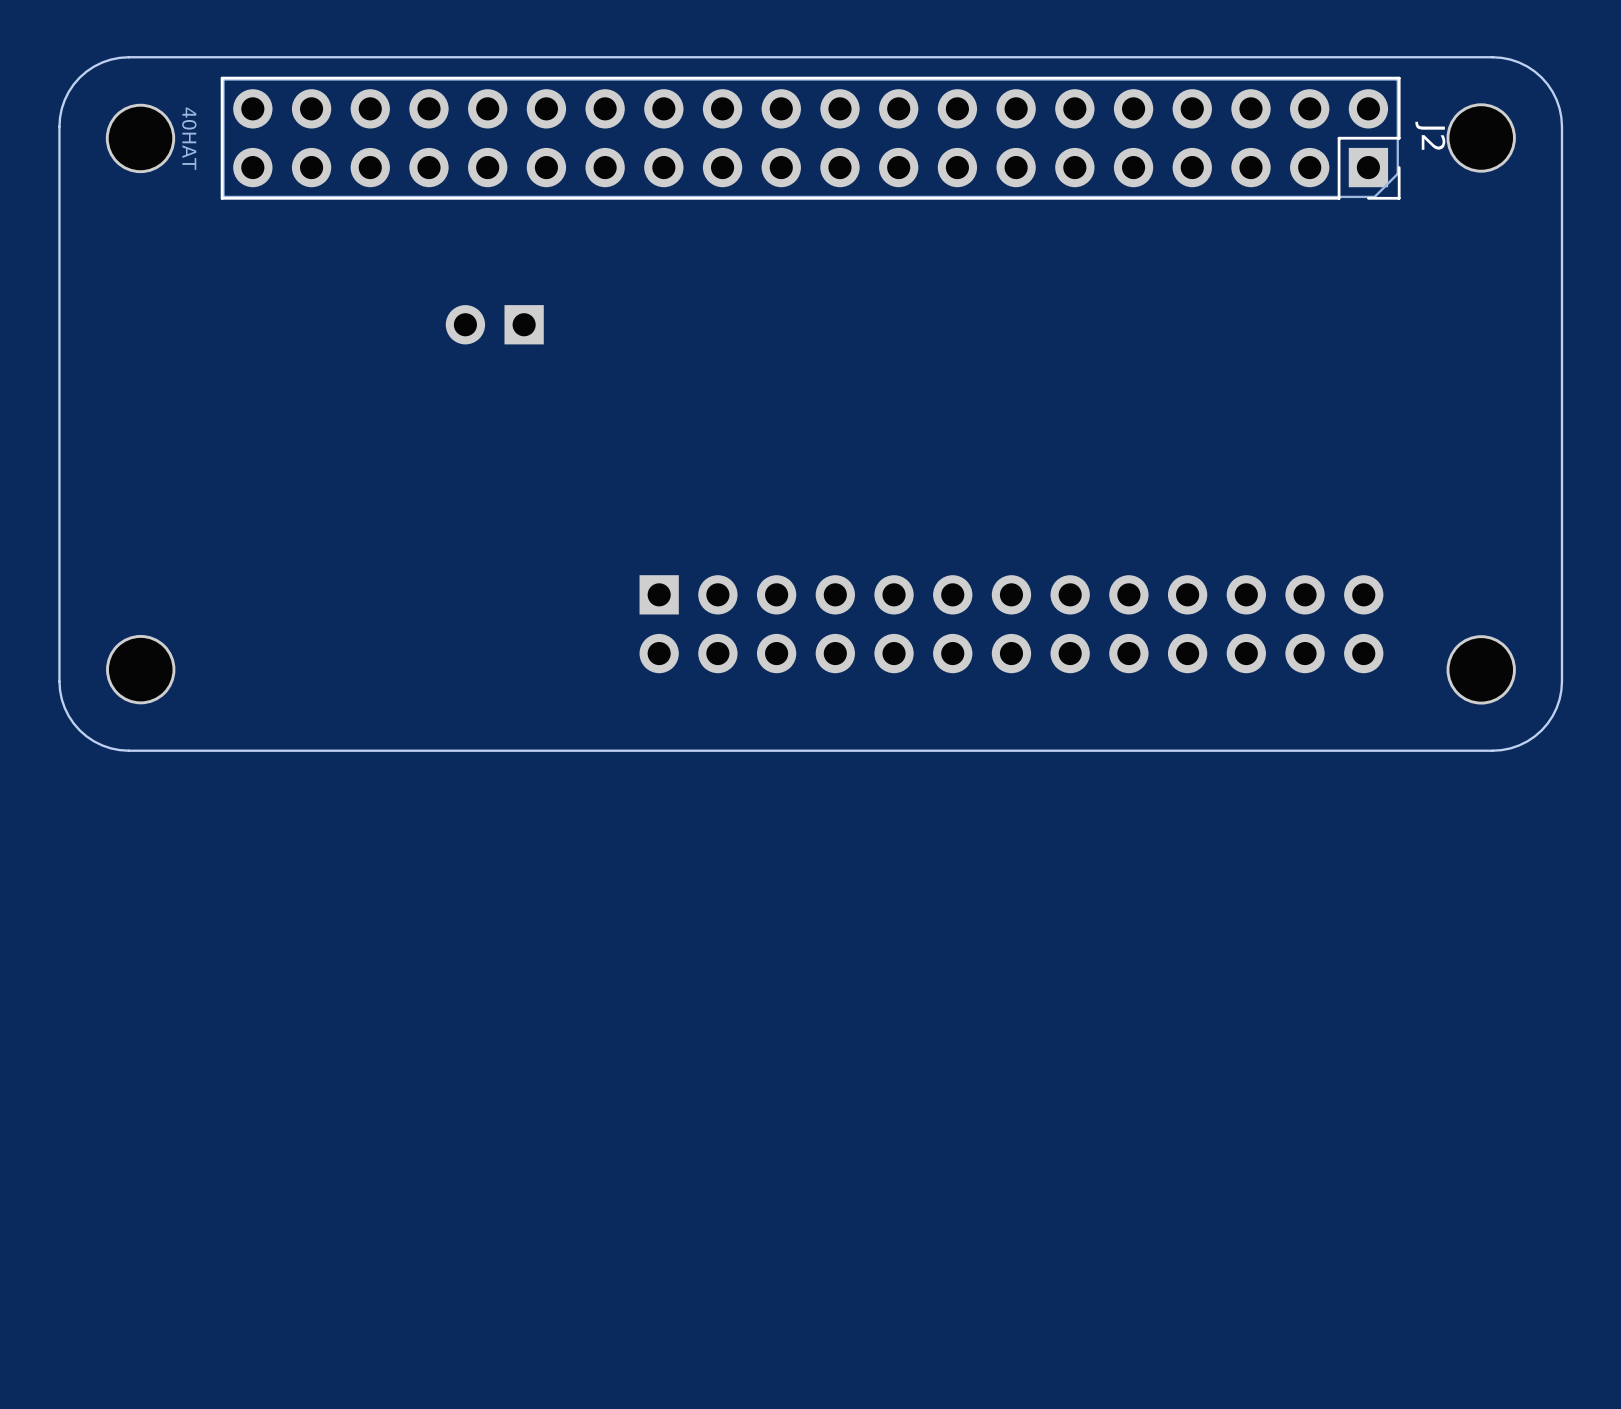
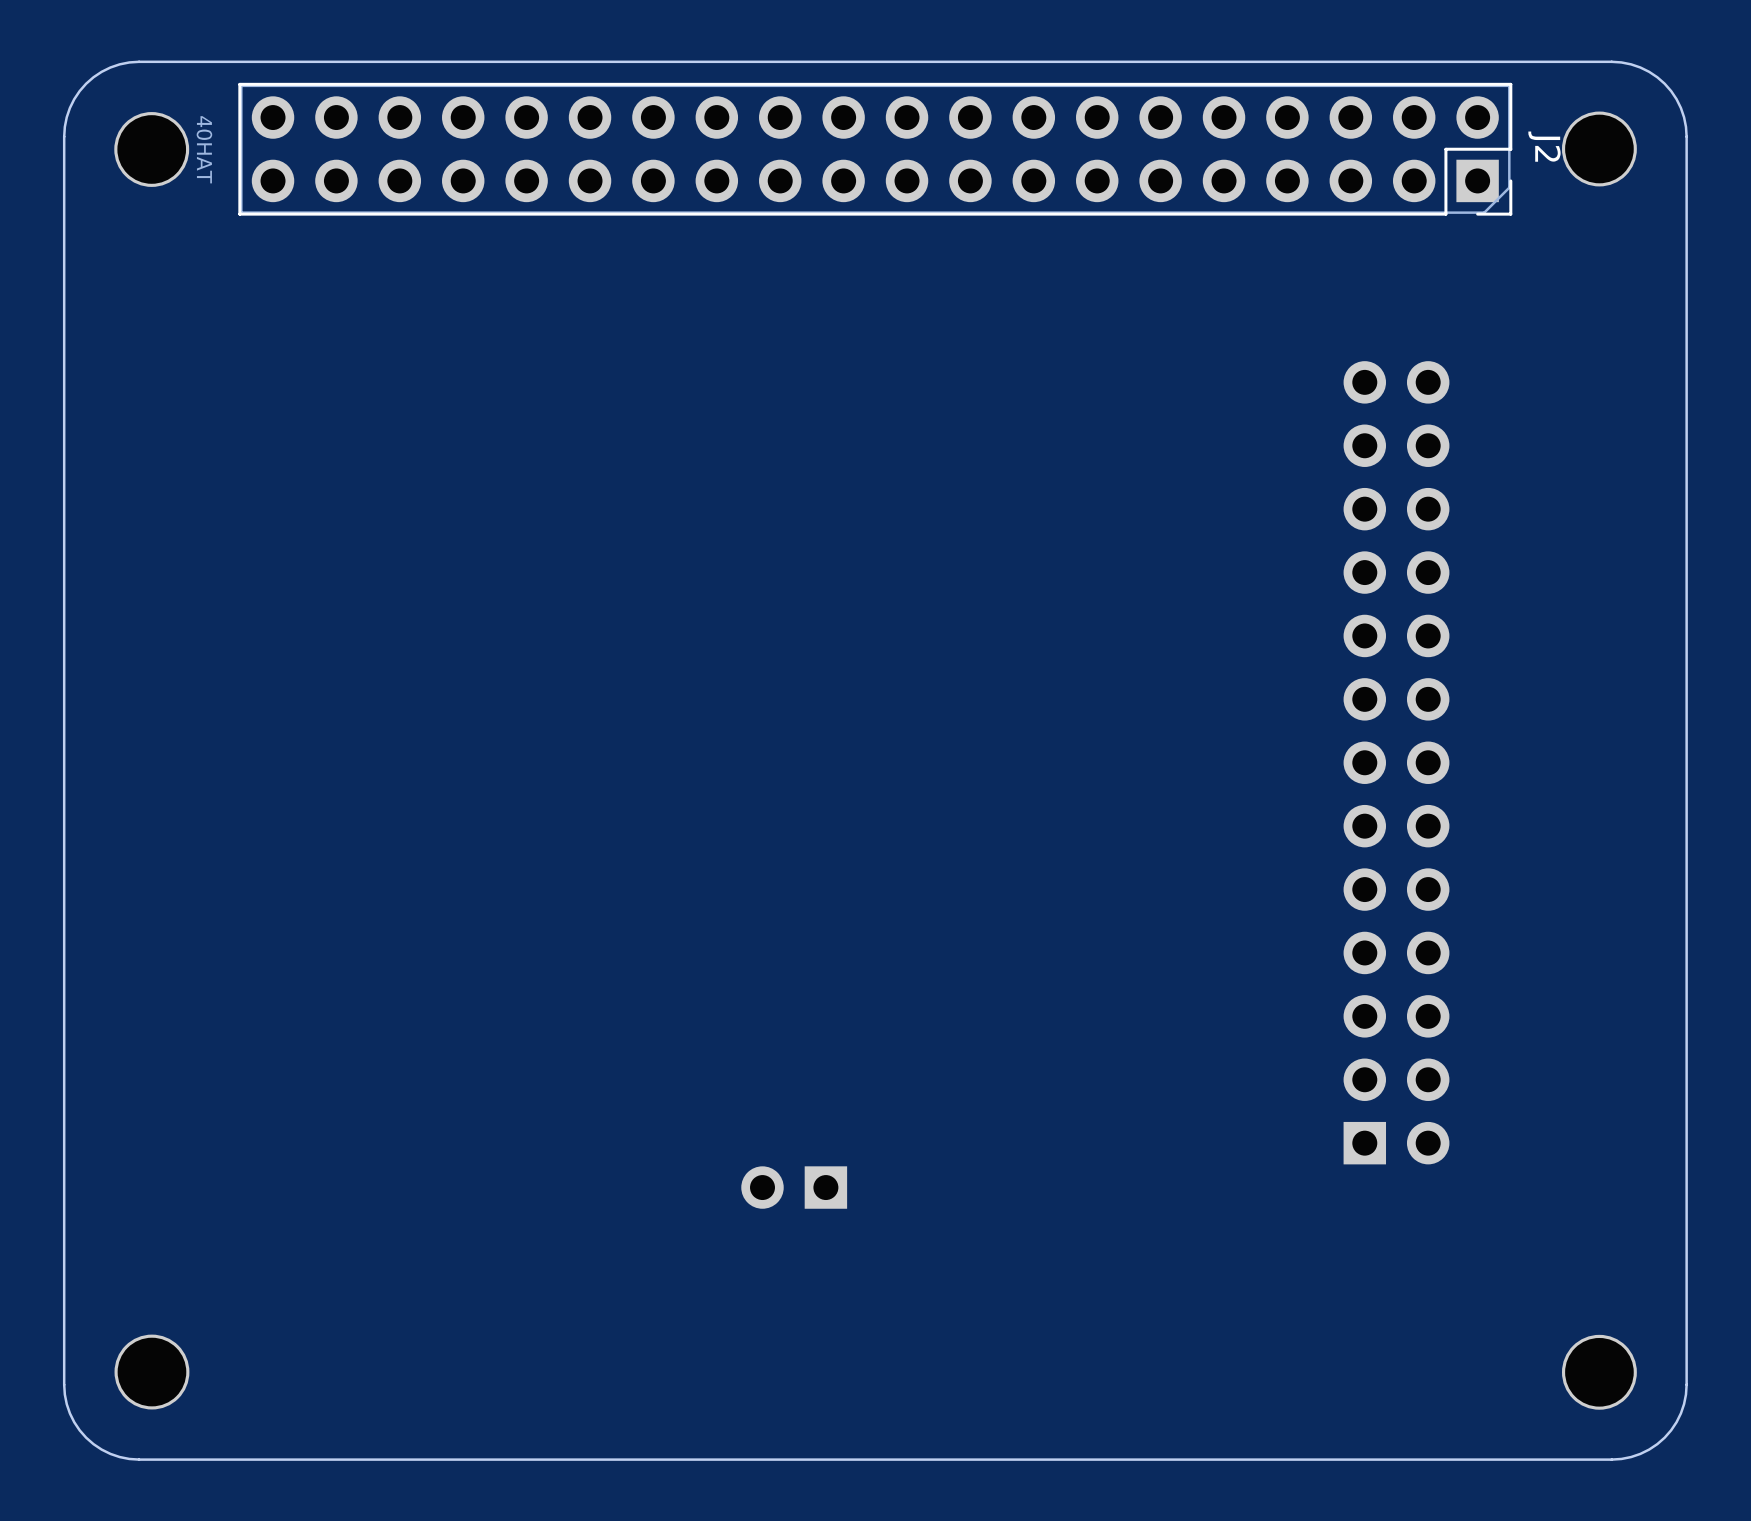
part: (494, 324) -> none
part rotation: 0° (1011, 624) -> 90° counterclockwise (1396, 762)
part: (140, 669) -> none
part: (1481, 669) -> none
board edge: (1561, 681) (1556, 707) (1541, 730) (1519, 745) (1492, 750) (128, 750) (102, 745) (79, 730) (64, 707) (59, 681) -> (1686, 735) (1685, 1394) (1680, 1413) (1664, 1437) (1640, 1453) (1611, 1459) (139, 1459) (110, 1453) (93, 1444) (79, 1430) (66, 1404) (64, 1384) (64, 735)
part: none -> (794, 1187)
part: none -> (151, 1372)
part: none -> (1599, 1372)

